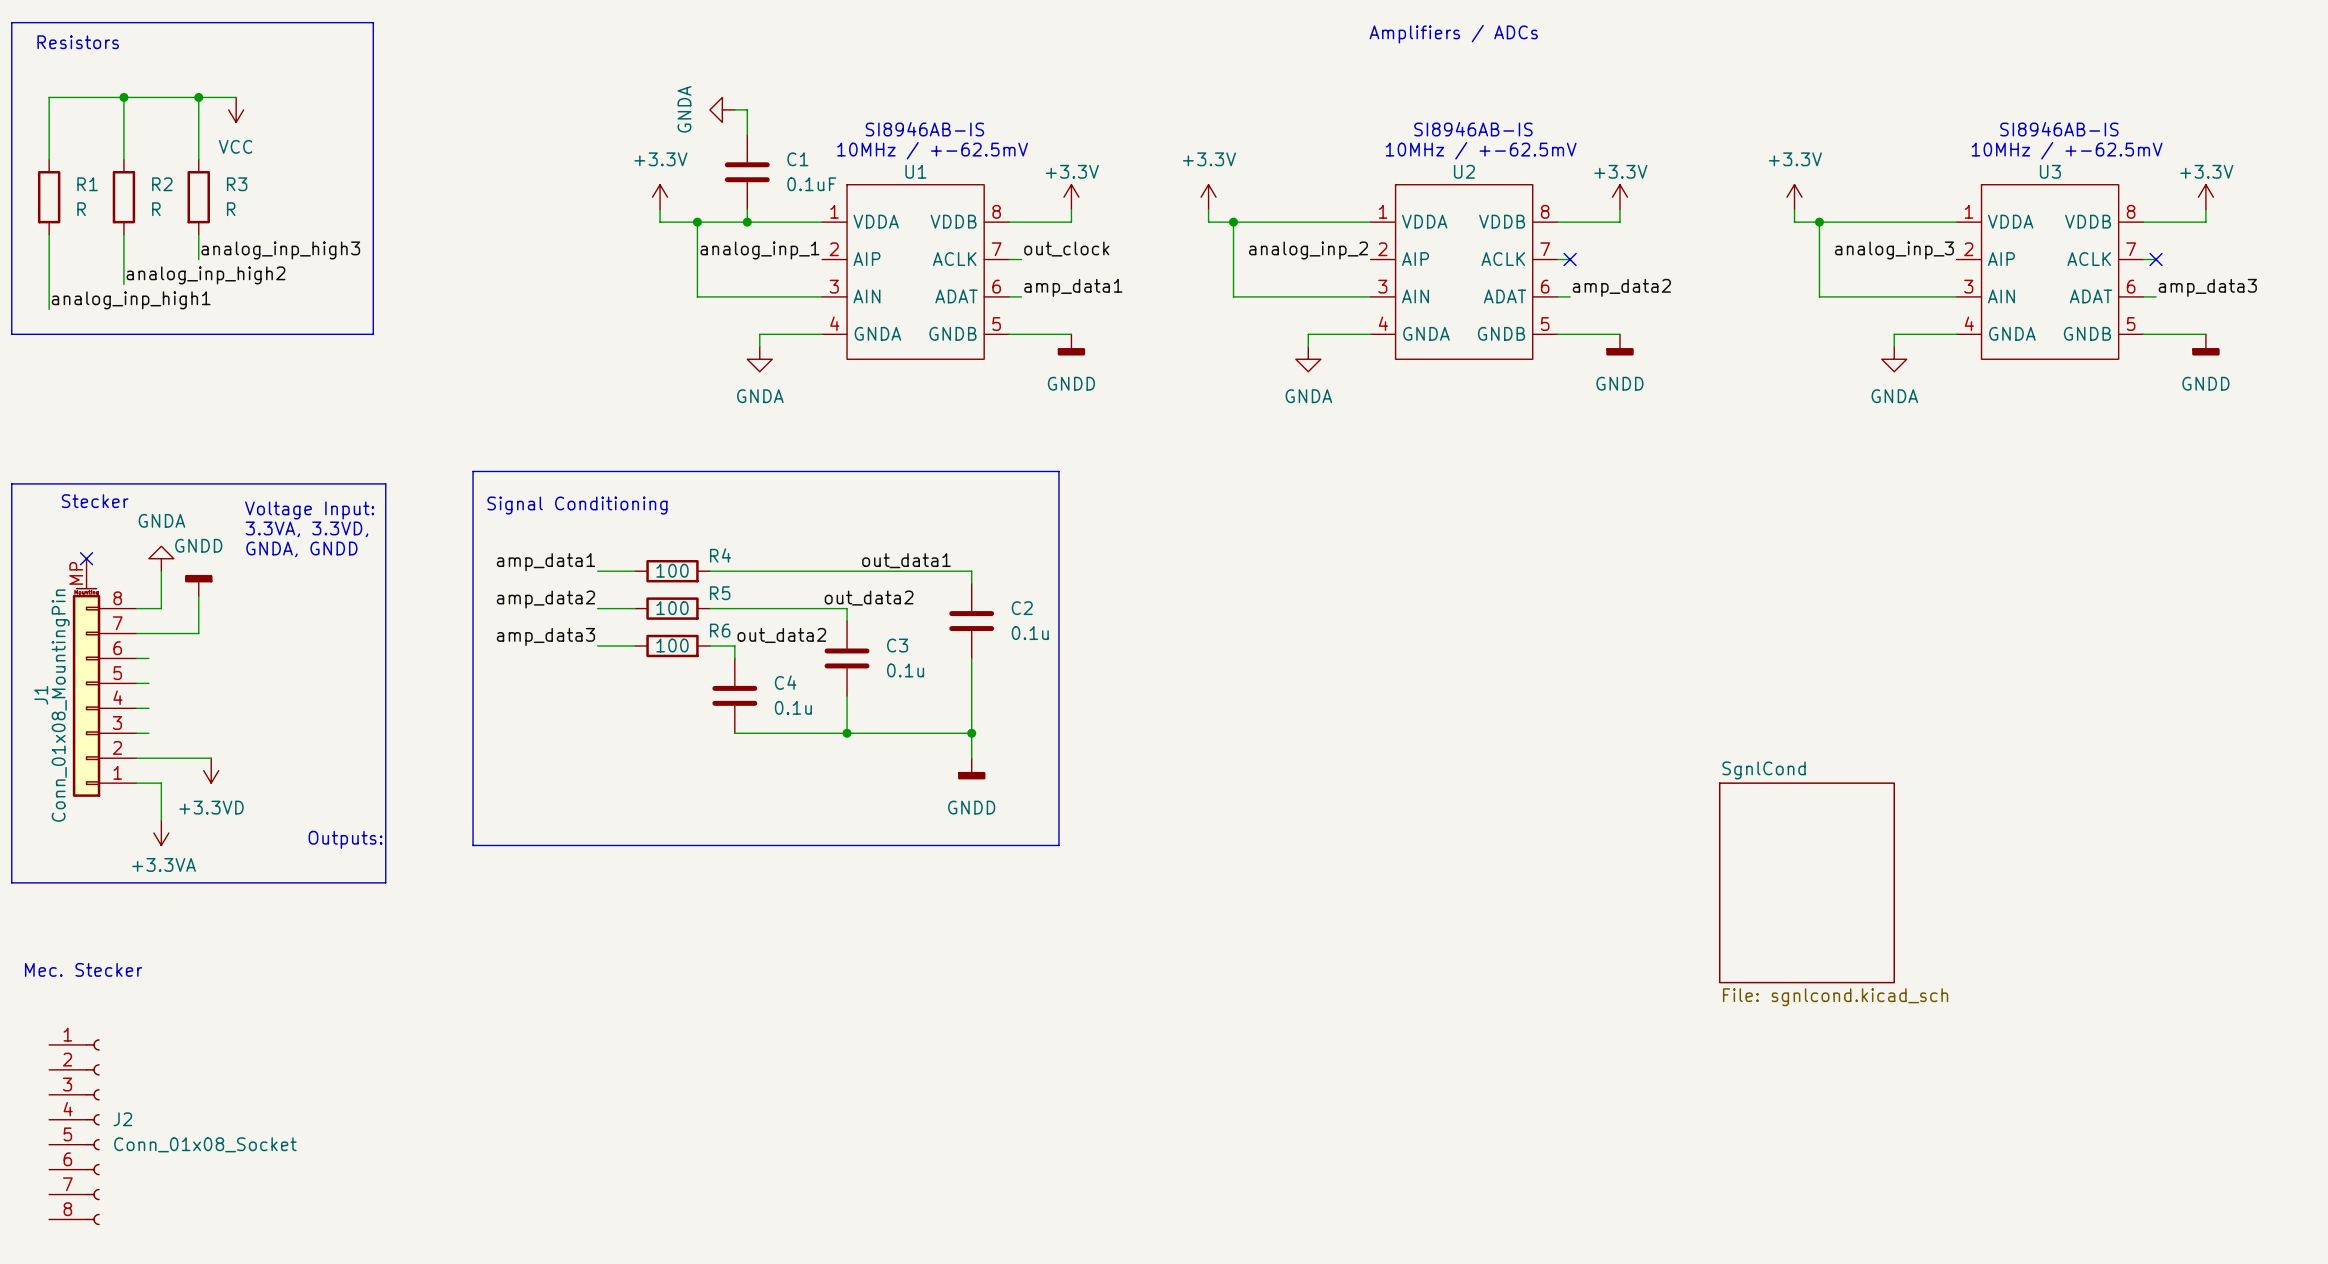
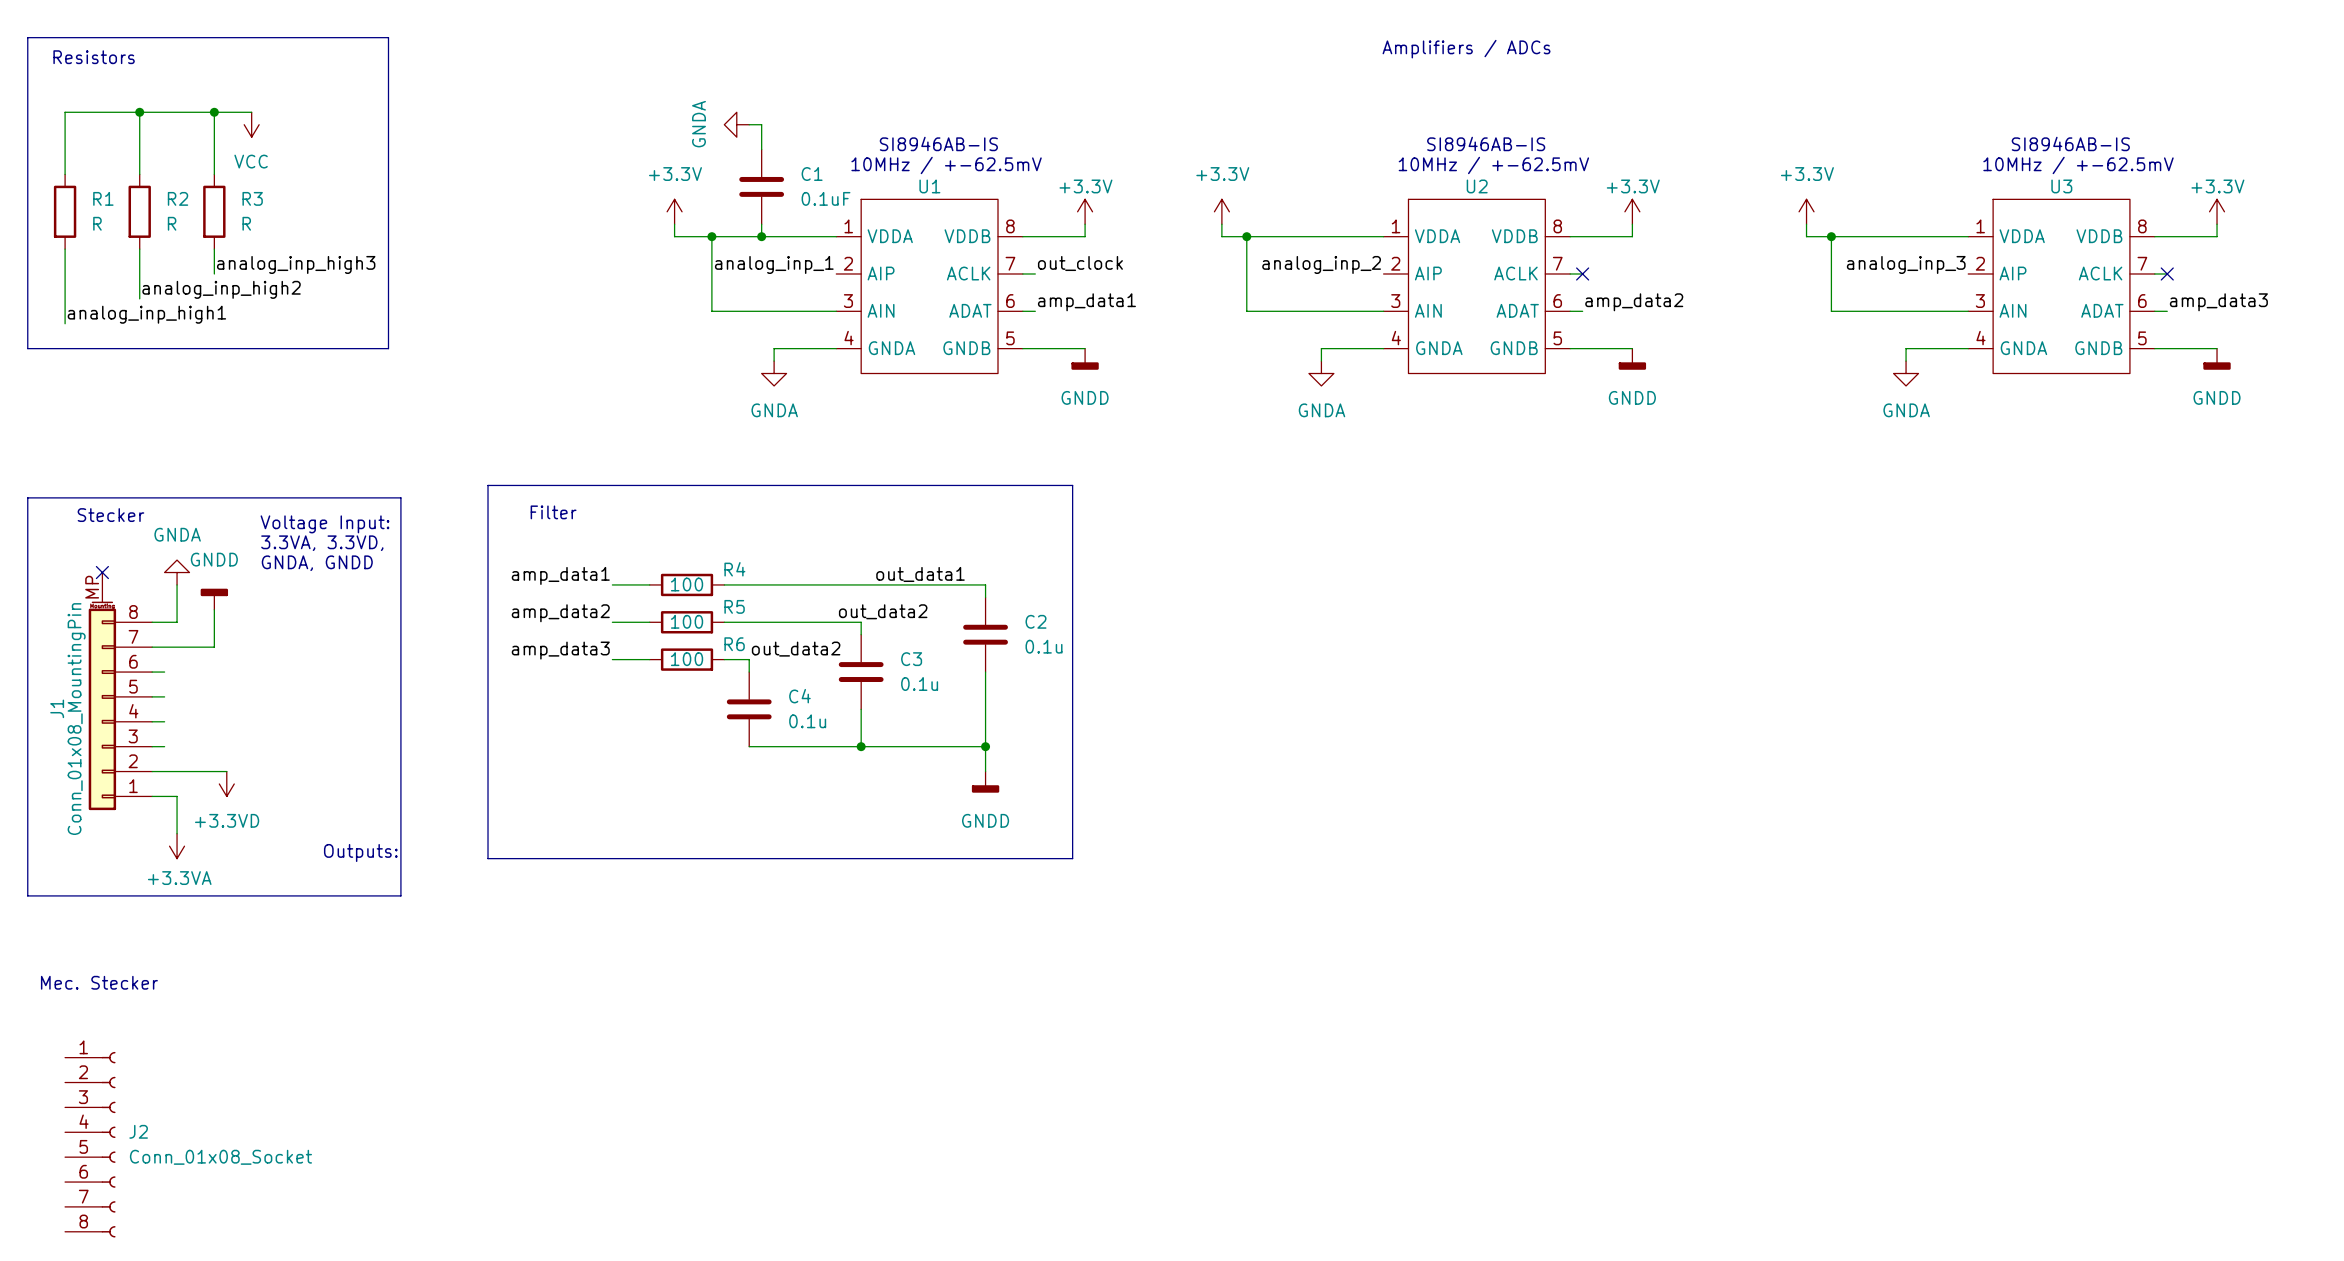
text: none -> Filter (553, 512)
text: Signal Conditioning (577, 505) -> none
sheet SgnlCond: File: sgnlcond.kicad_sch (1806, 882) -> none

